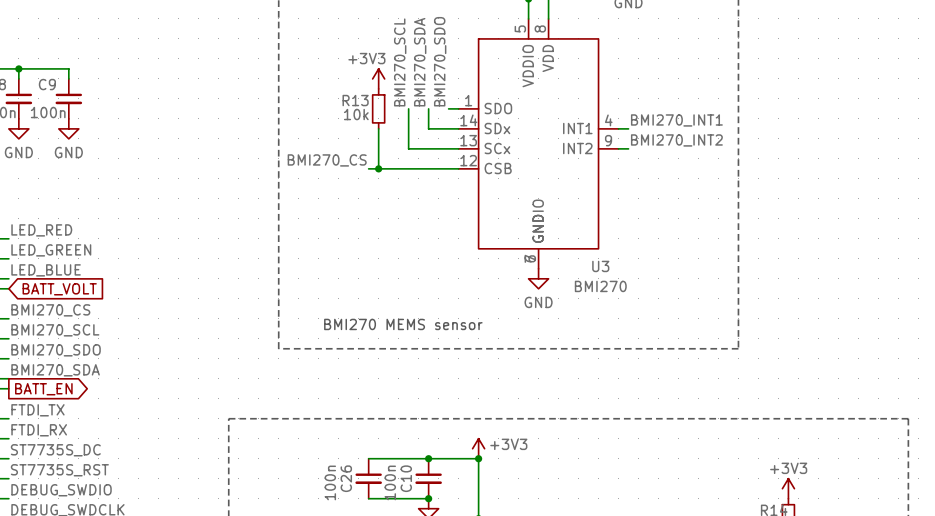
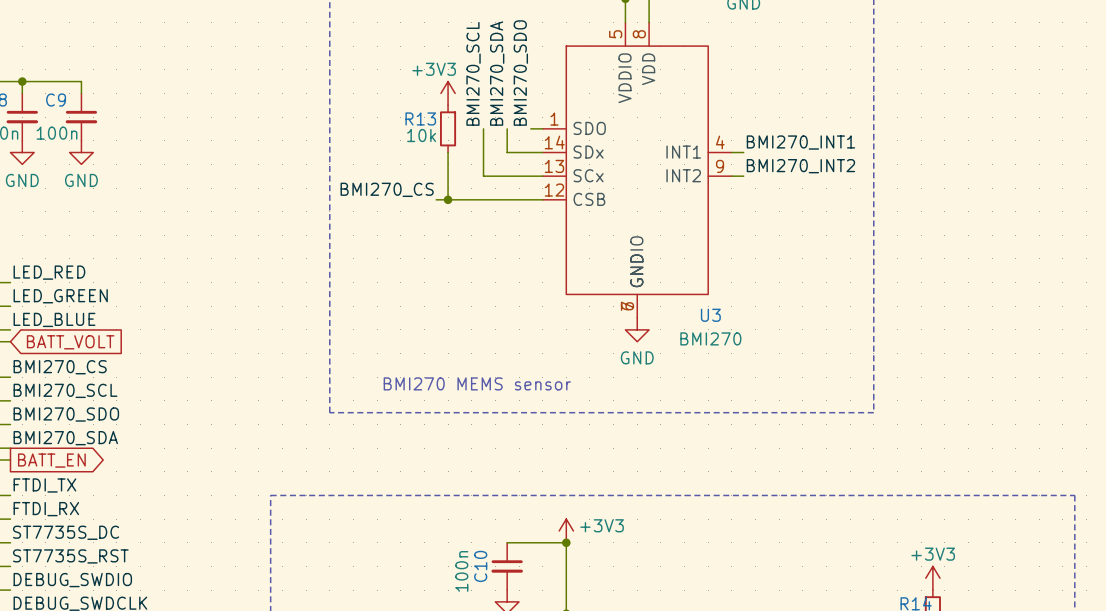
wire: (368, 458) (428, 458) -> none
junction: (428, 458) -> none
C26: 100n (368, 478) -> none
wire: (368, 498) (428, 498) -> none
junction: (428, 498) -> none

